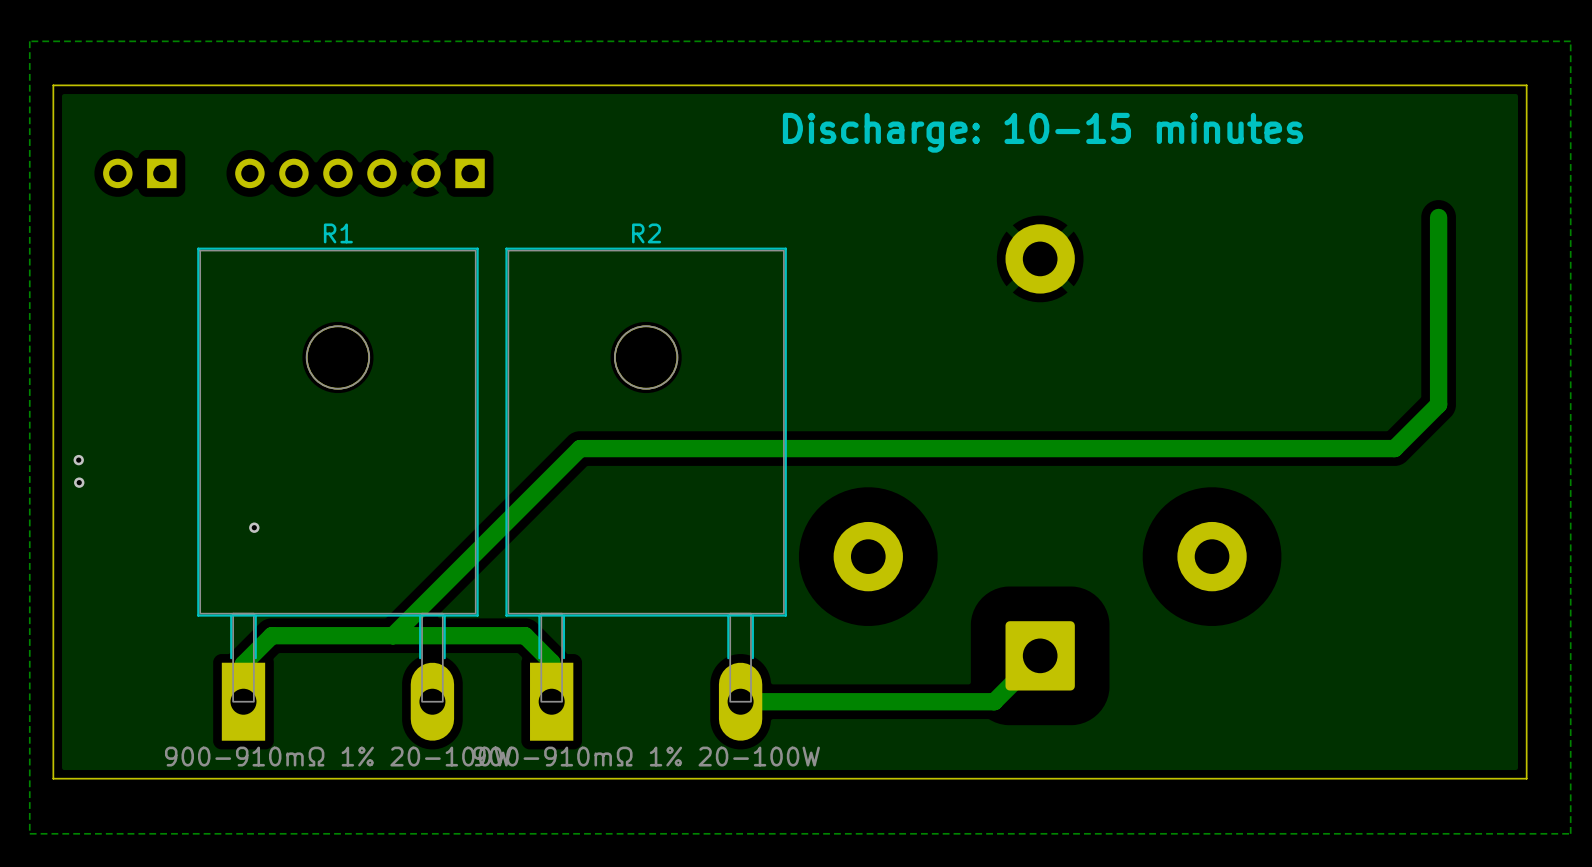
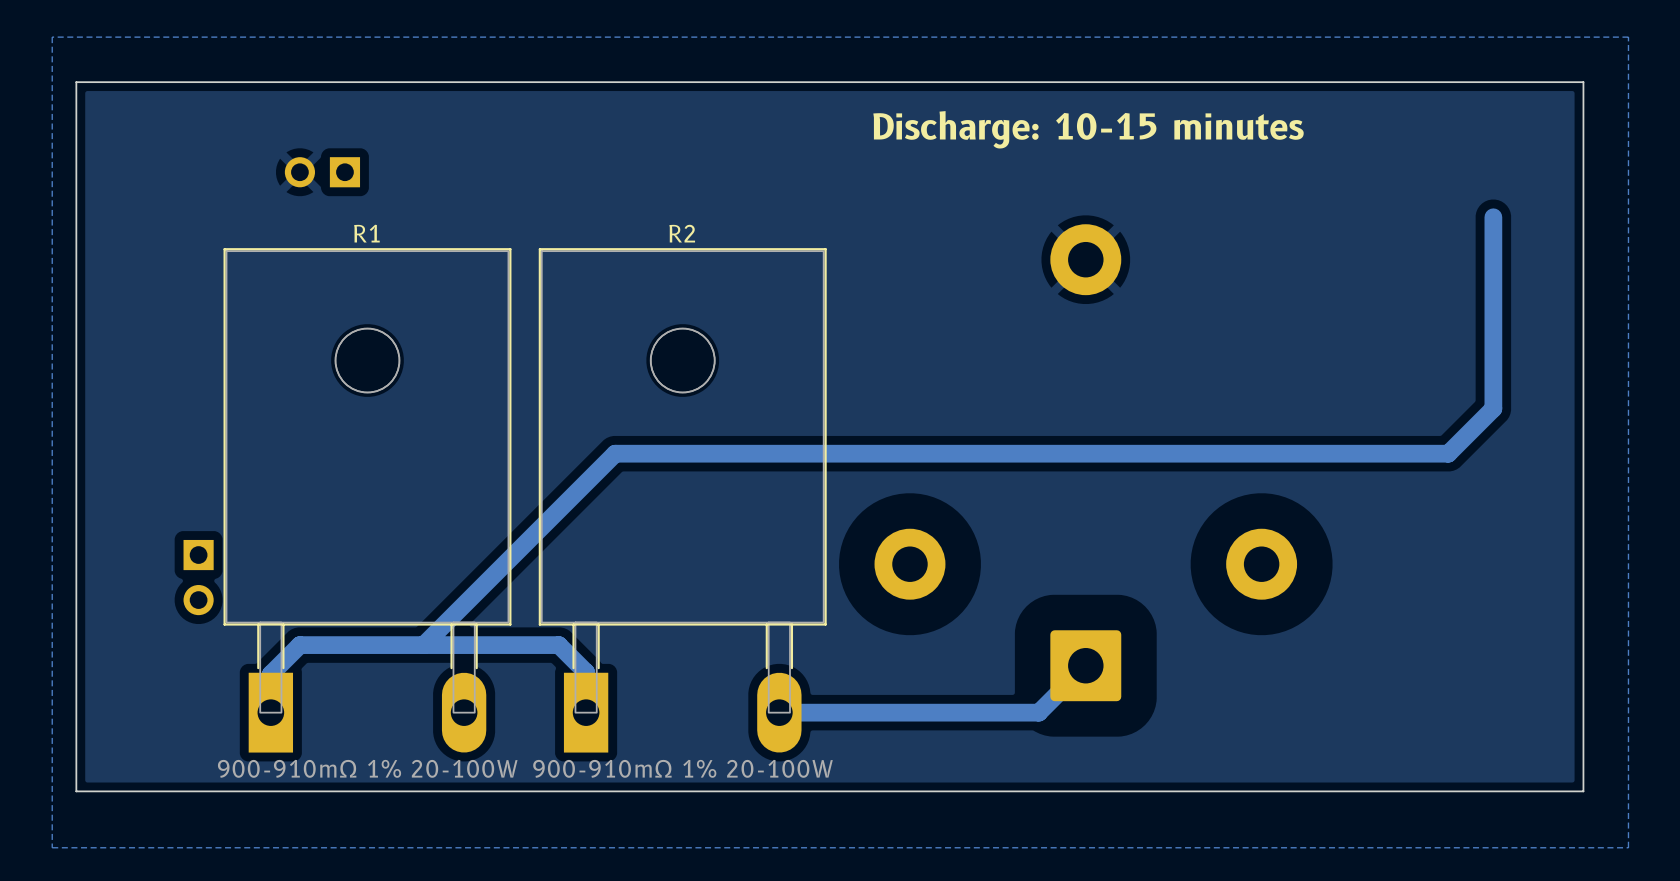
part position: (139, 173) -> (322, 172)
part: (359, 173) -> none
via: (78, 460) -> none
via: (79, 482) -> none
via: (254, 527) -> none
part: none -> (198, 577)

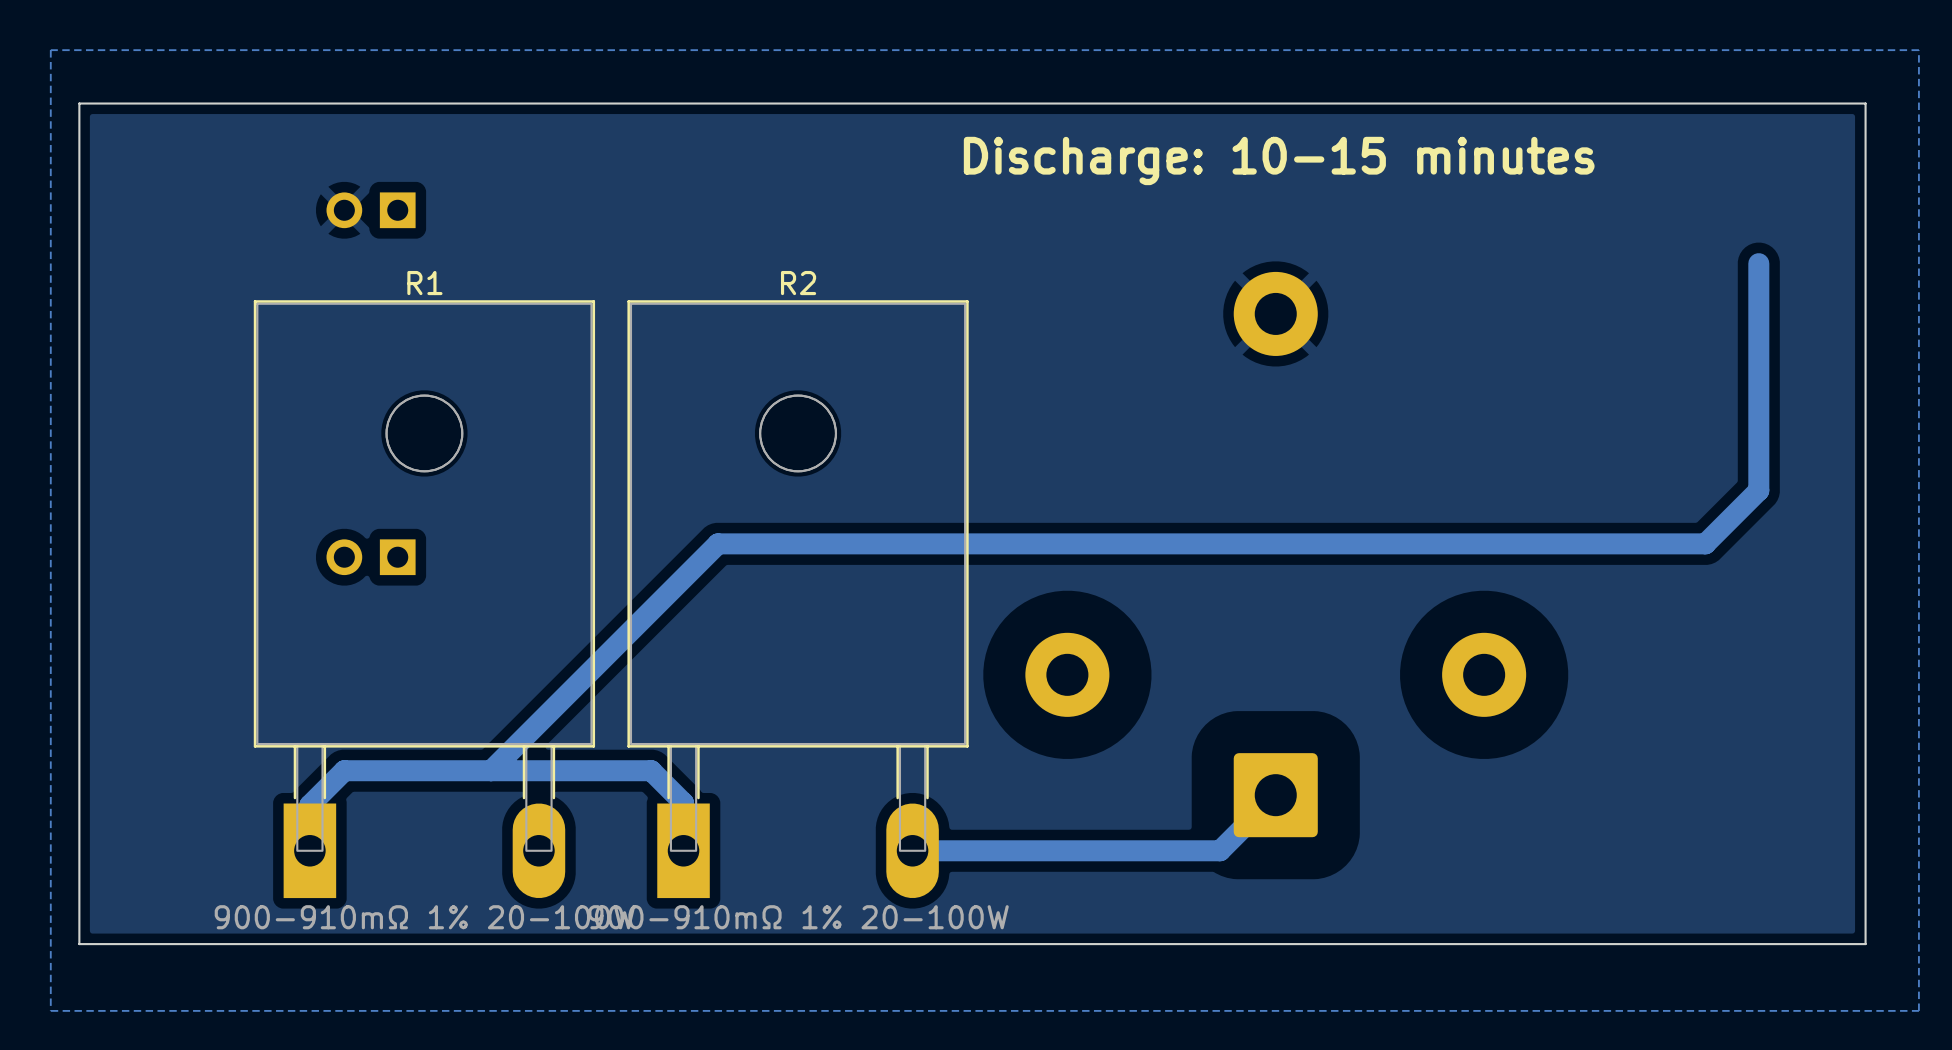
part rotation: 0° (198, 577) -> 90° clockwise (371, 557)
part position: (198, 577) -> (371, 557)

